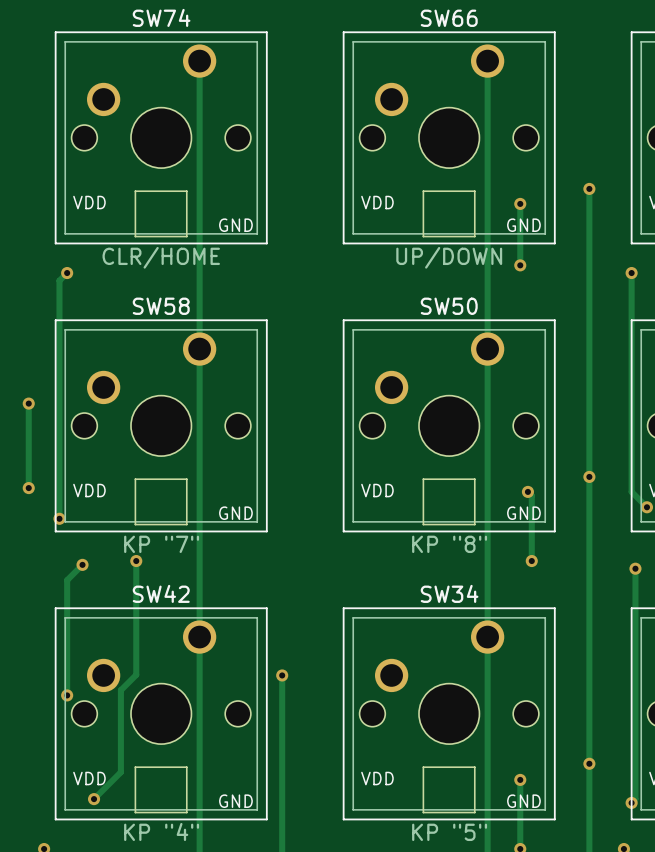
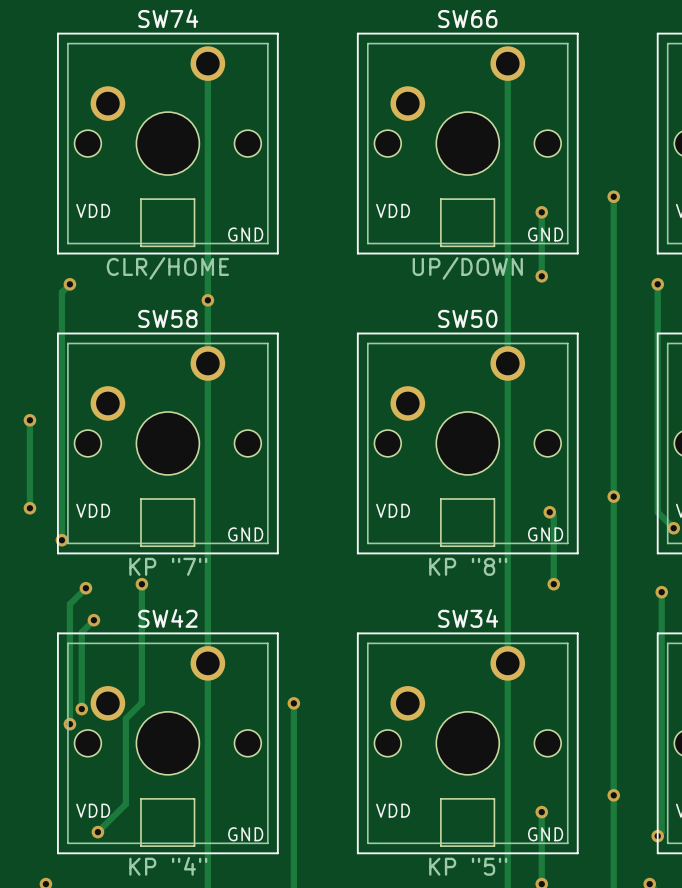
via: none -> (207, 300)
track: none -> (93, 620) (81, 632) (81, 709)
via: none -> (93, 620)
via: none -> (81, 709)

